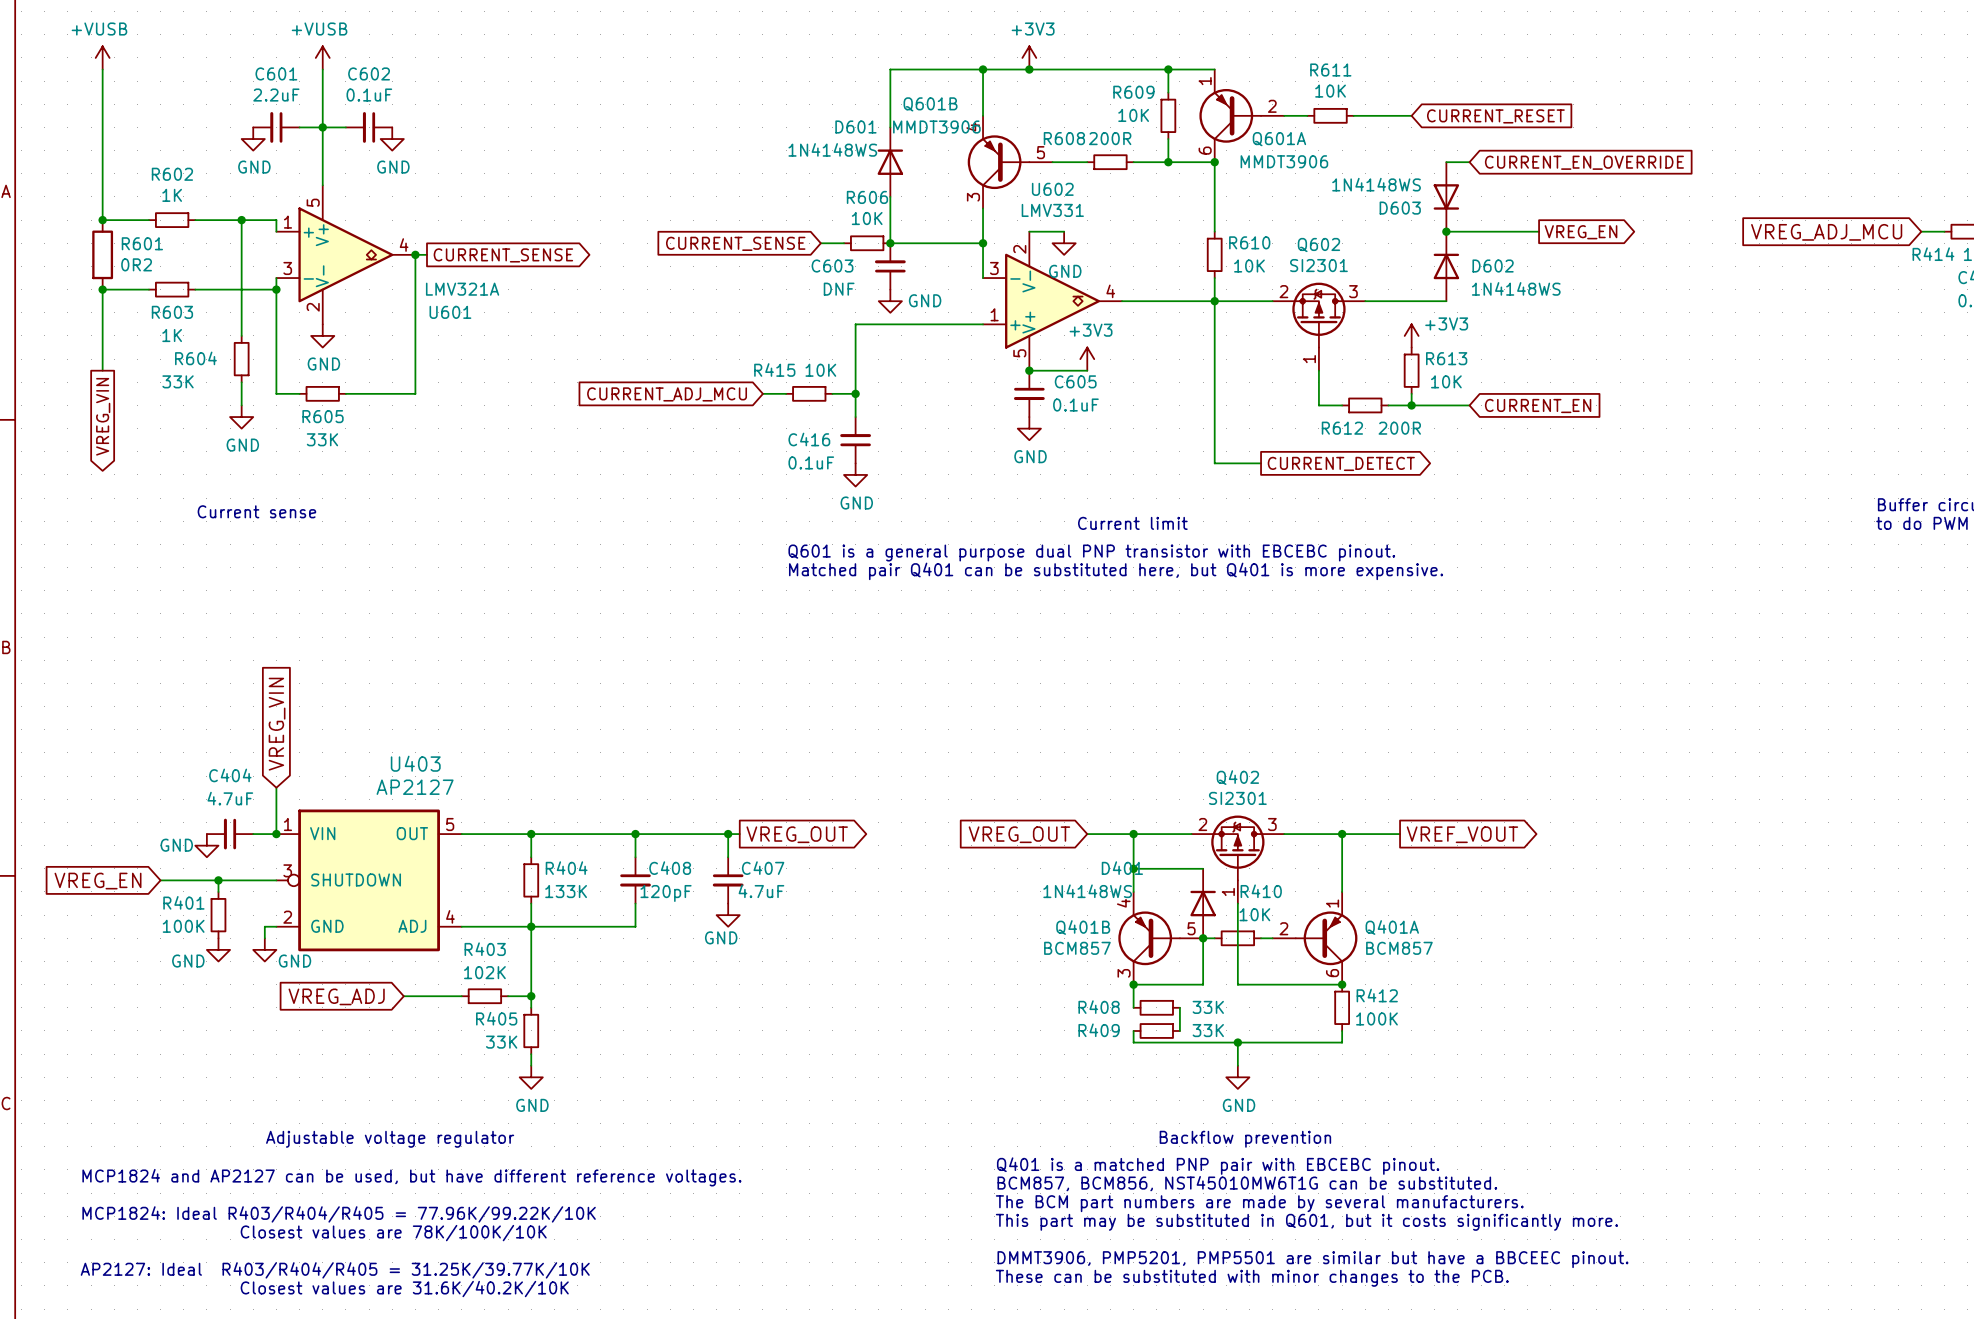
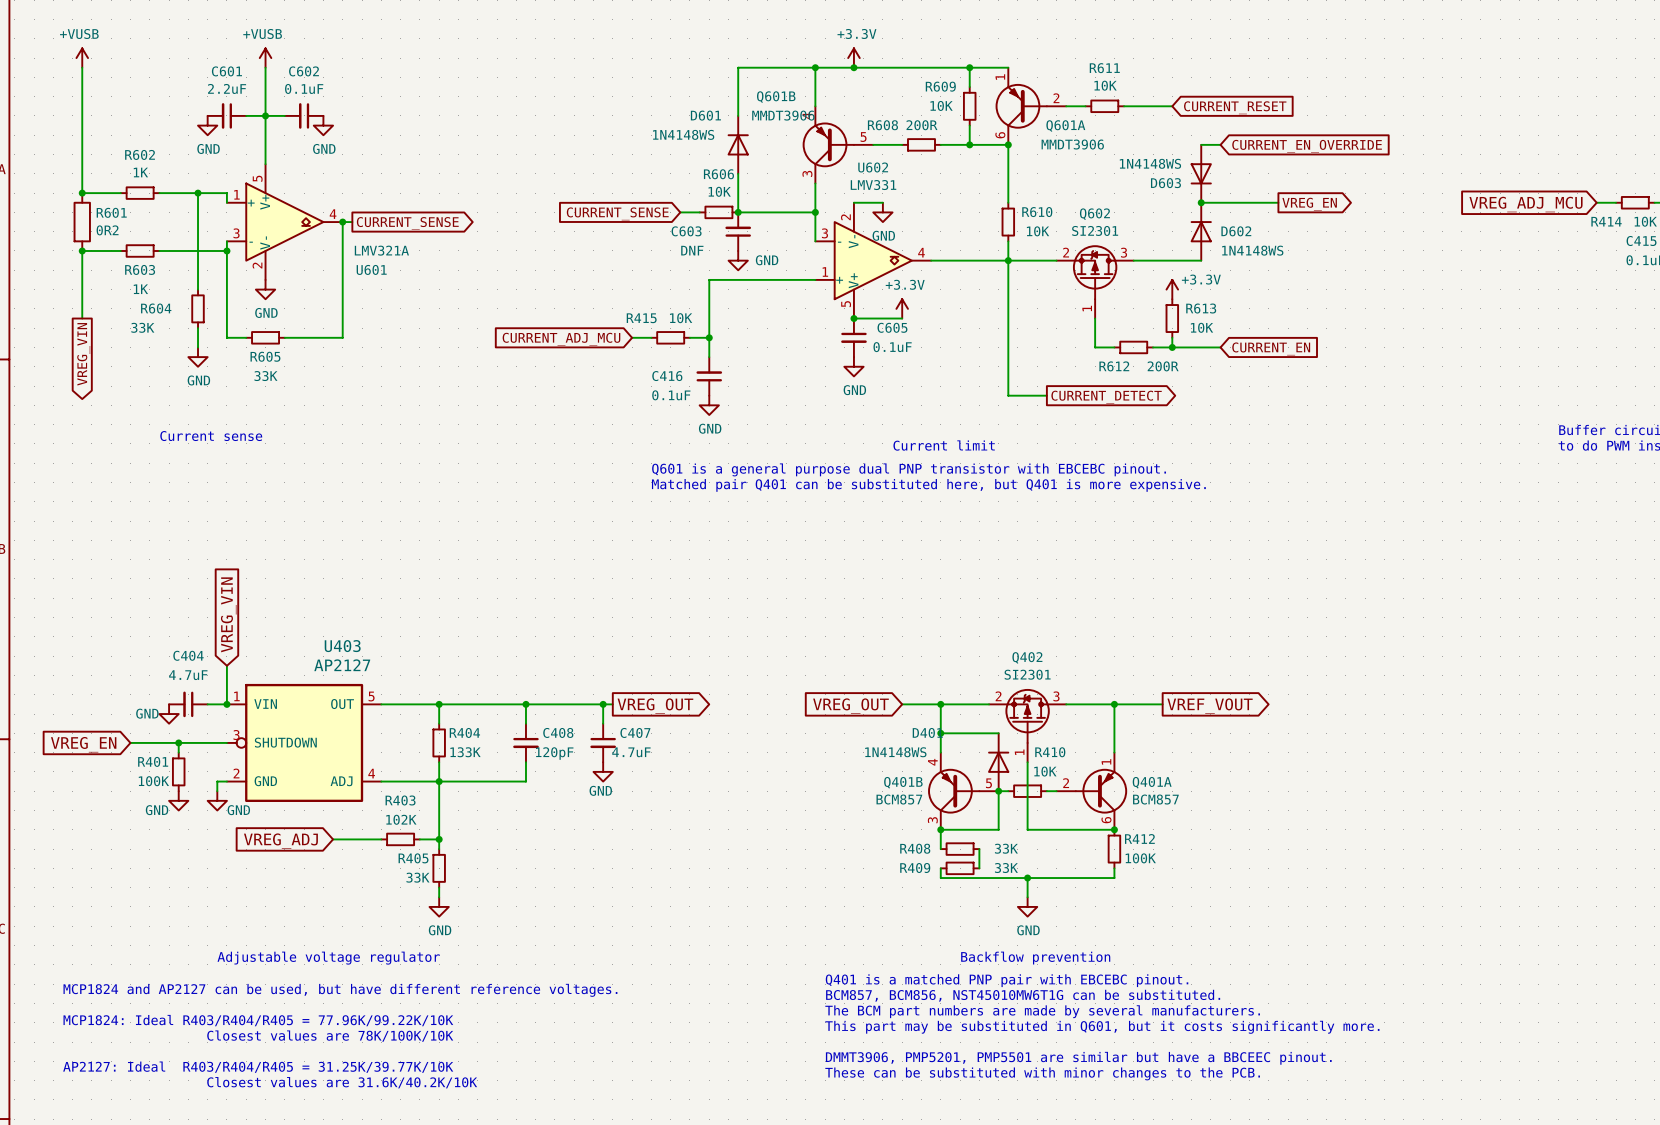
power symbol: +3V3 (1029, 57) -> +3.3V (853, 58)
power symbol: +3V3 (1411, 335) -> +3.3V (1172, 289)
power symbol: +3V3 (1087, 359) -> +3.3V (902, 308)

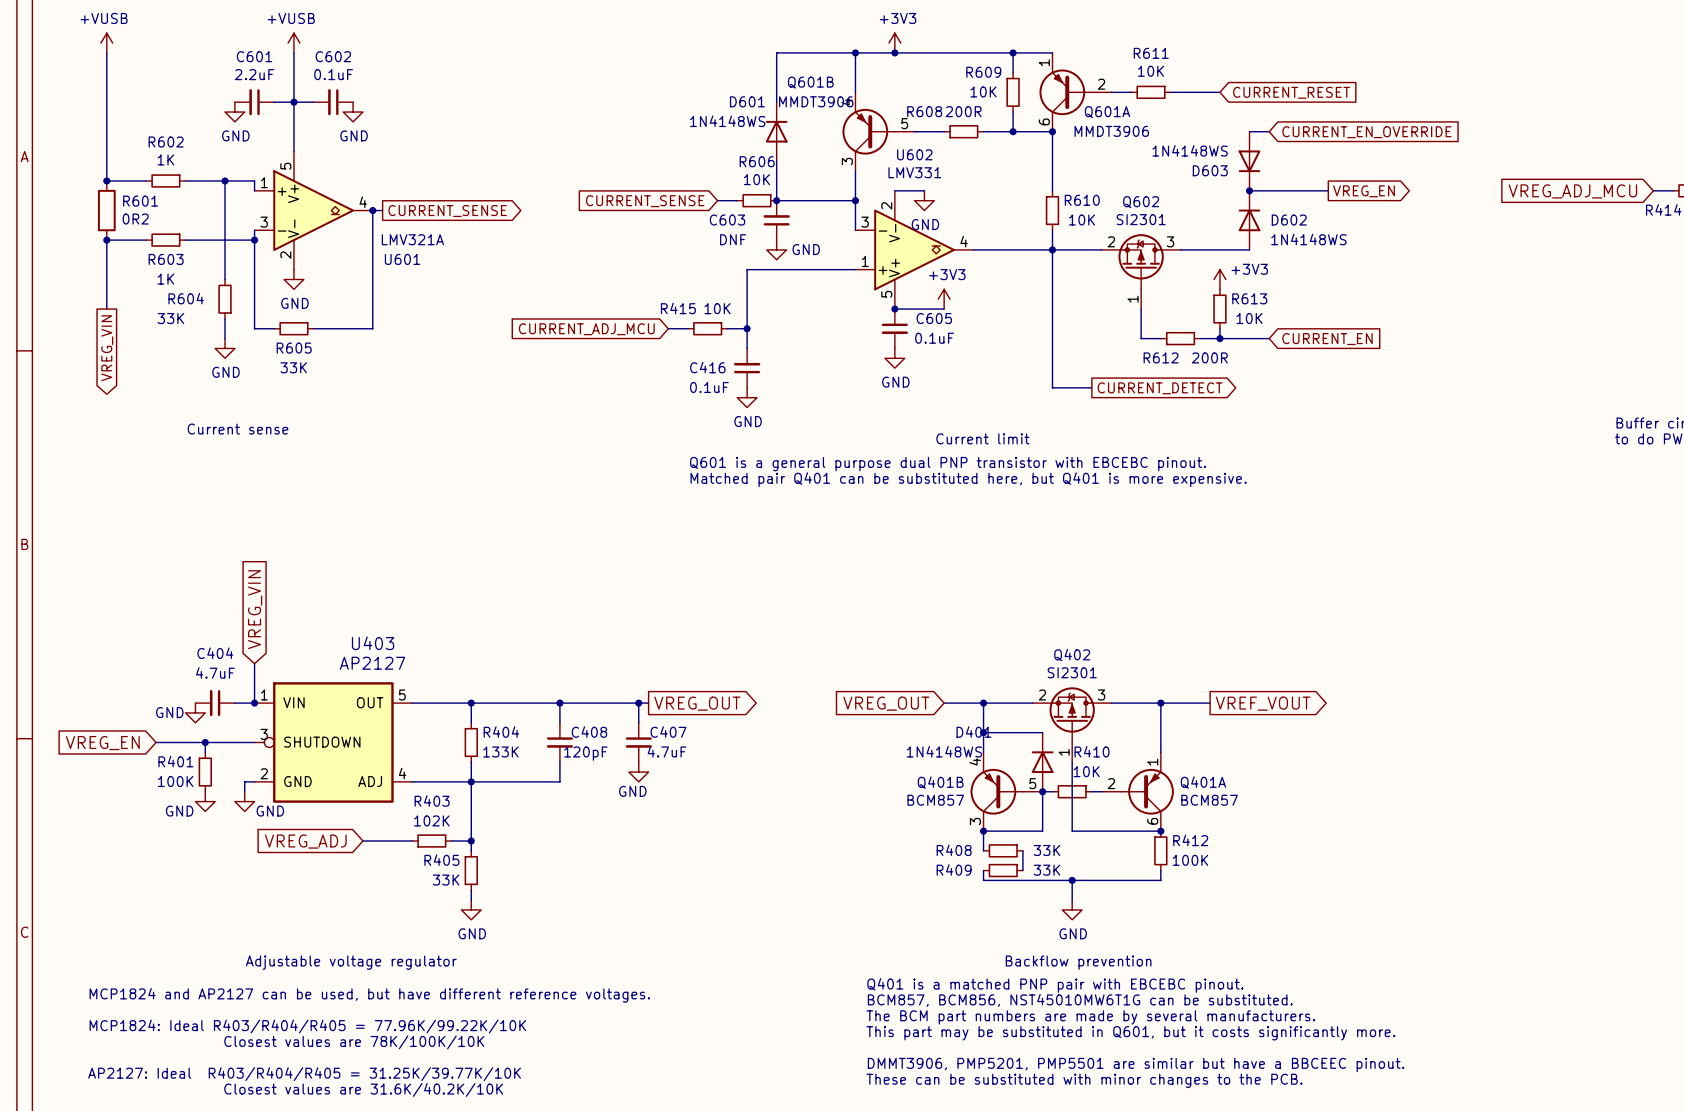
power symbol: +3.3V (853, 58) -> +3V3 (894, 43)
power symbol: +3.3V (1172, 289) -> +3V3 (1219, 279)
power symbol: +3.3V (902, 308) -> +3V3 (944, 299)

